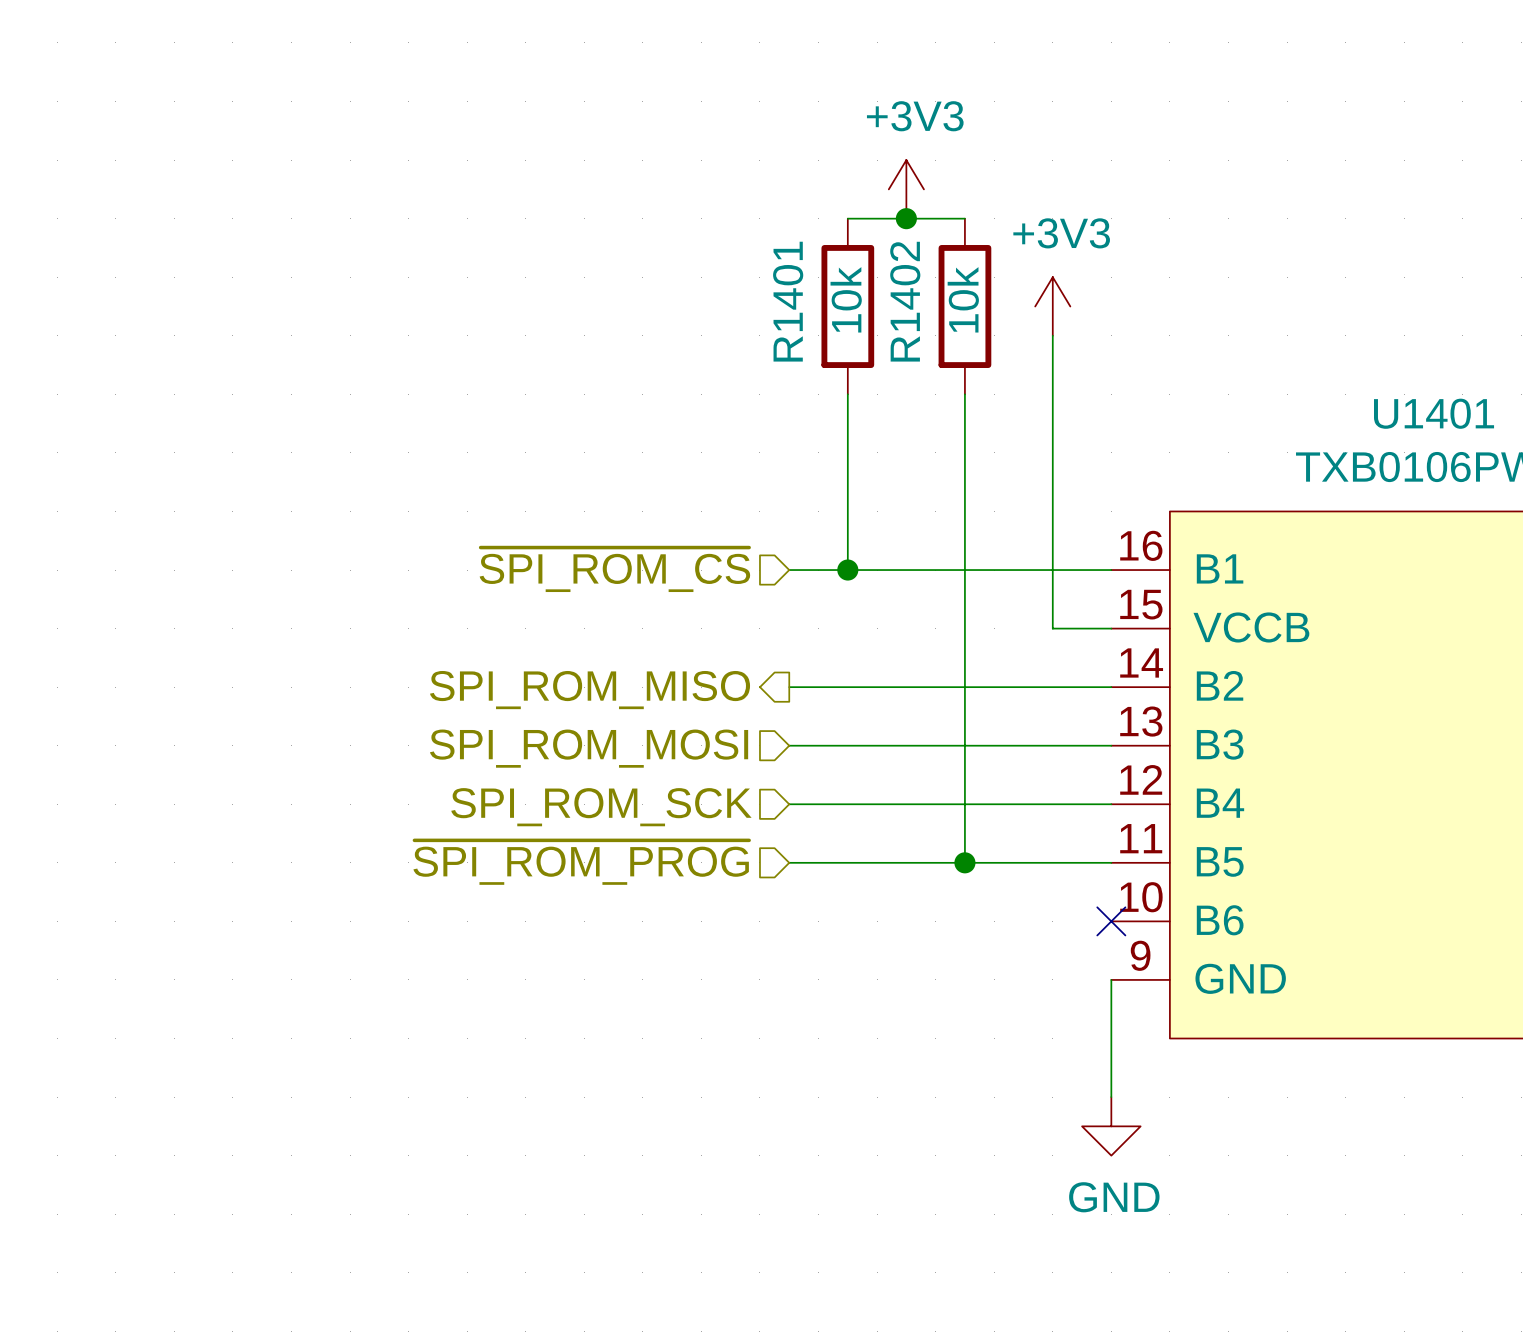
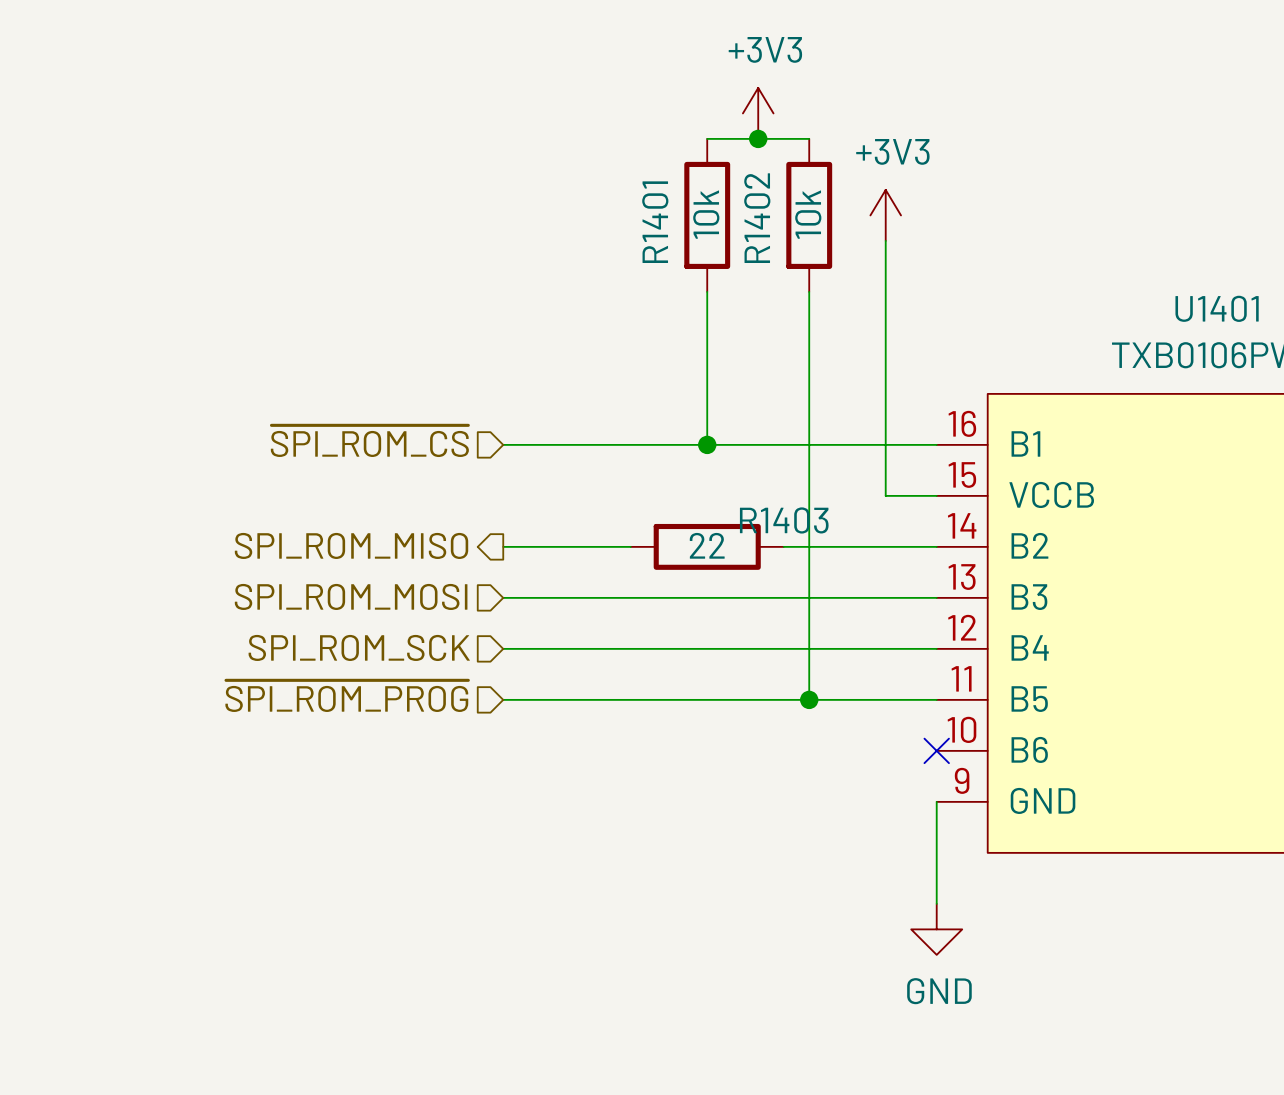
hierarchical label position: ~{SPI_ROM_CS} (614, 569) -> ~{SPI_ROM_CS} (369, 441)
wire: none -> (503, 444) (656, 444)
wire: (789, 687) (935, 687) -> (503, 546) (630, 546)
R1403: none -> 22 (707, 546)
hierarchical label position: SPI_ROM_MISO (590, 690) -> SPI_ROM_MISO (351, 545)
wire: none -> (503, 597) (656, 597)
hierarchical label position: SPI_ROM_MOSI (589, 748) -> SPI_ROM_MOSI (351, 596)
wire: none -> (503, 648) (656, 648)
hierarchical label position: SPI_ROM_SCK (601, 807) -> SPI_ROM_SCK (359, 647)
hierarchical label position: ~{SPI_ROM_PROG} (581, 862) -> ~{SPI_ROM_PROG} (346, 696)
wire: none -> (503, 699) (656, 699)

